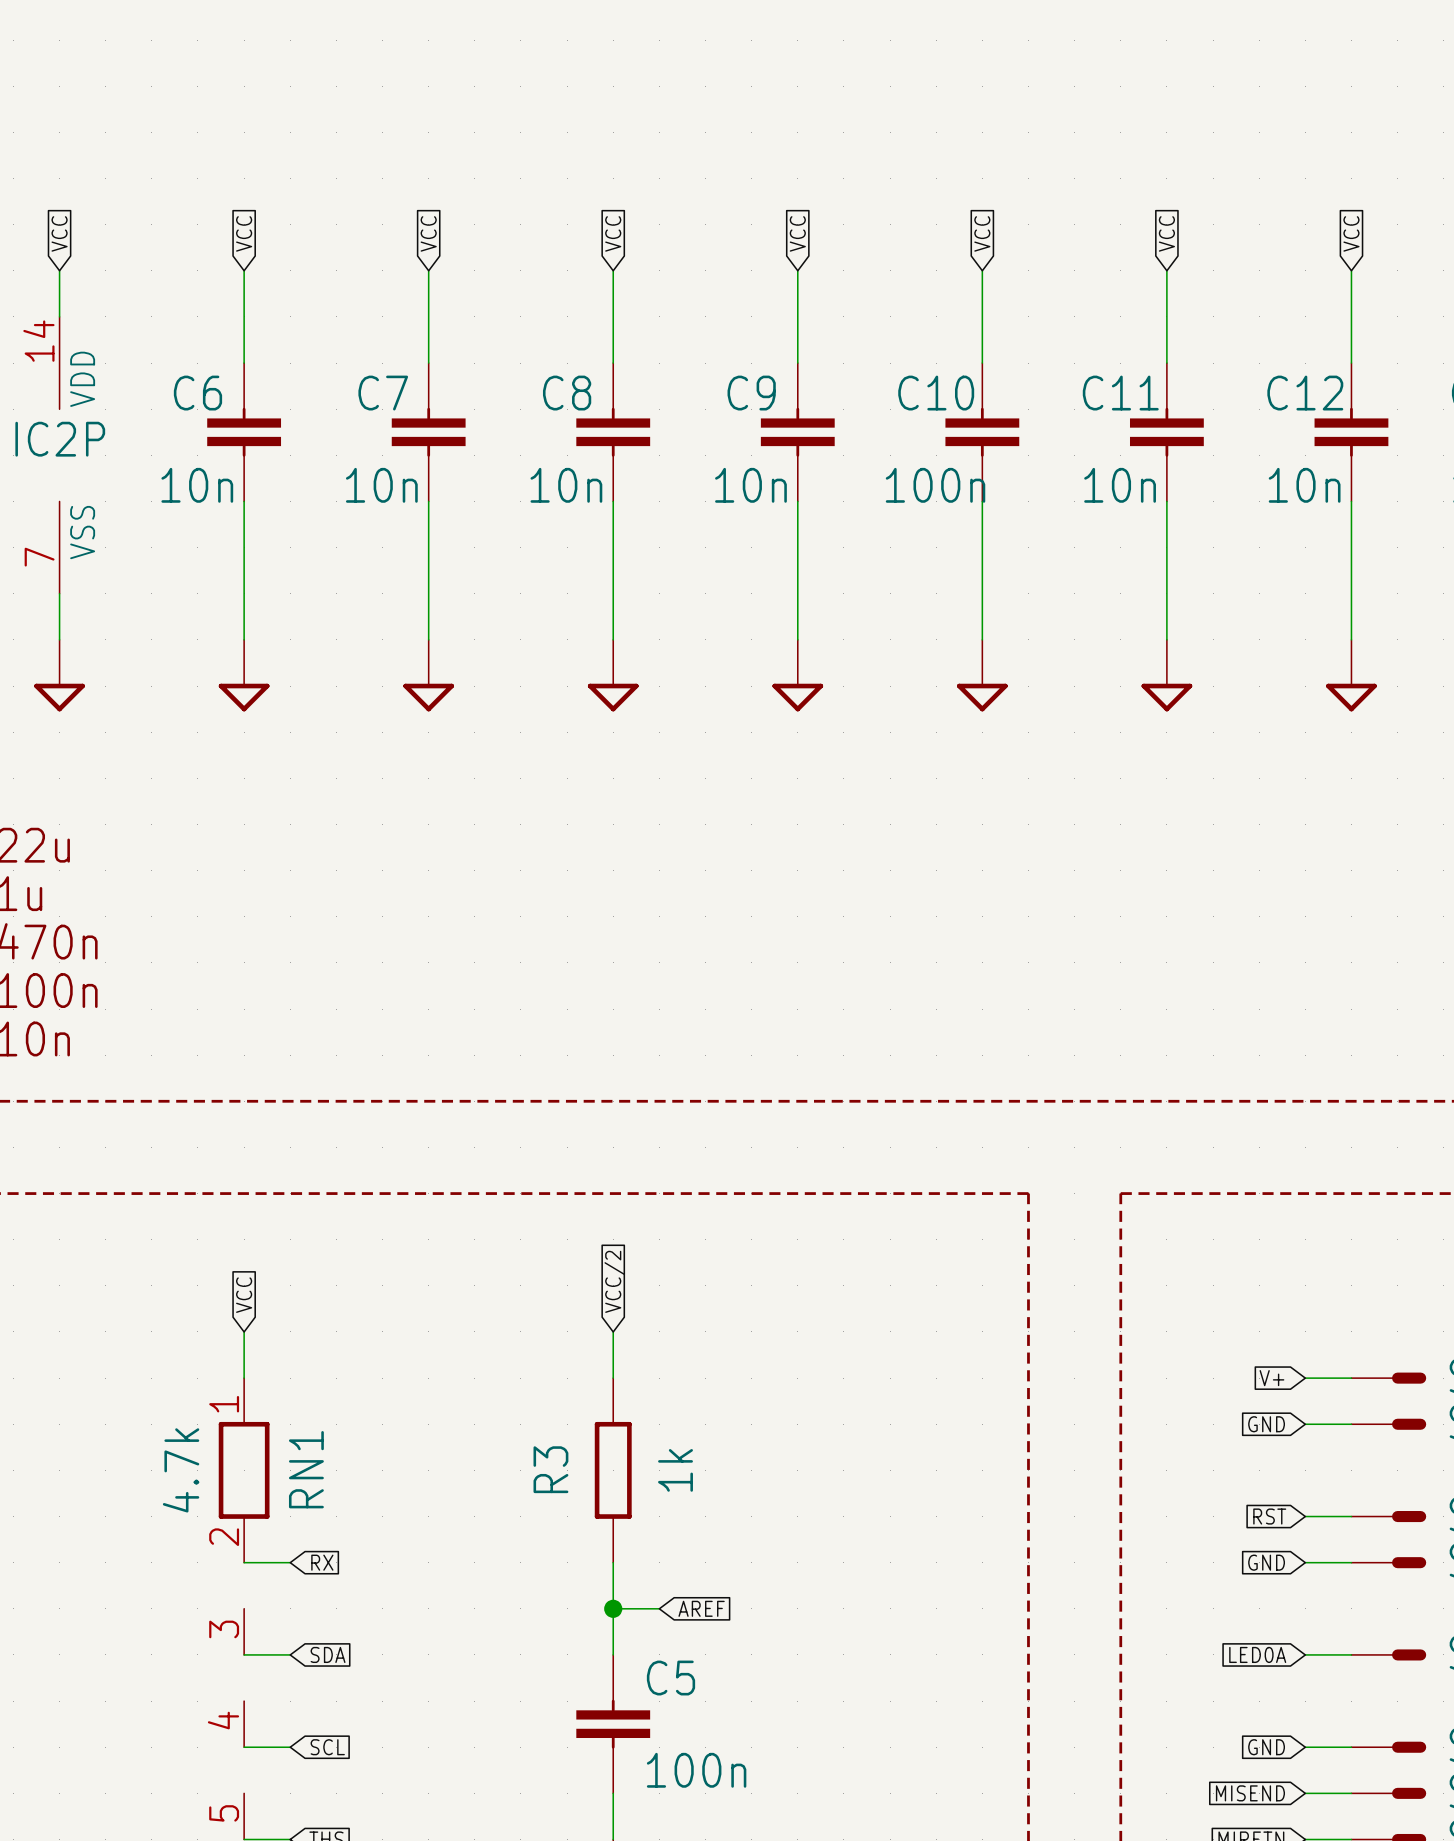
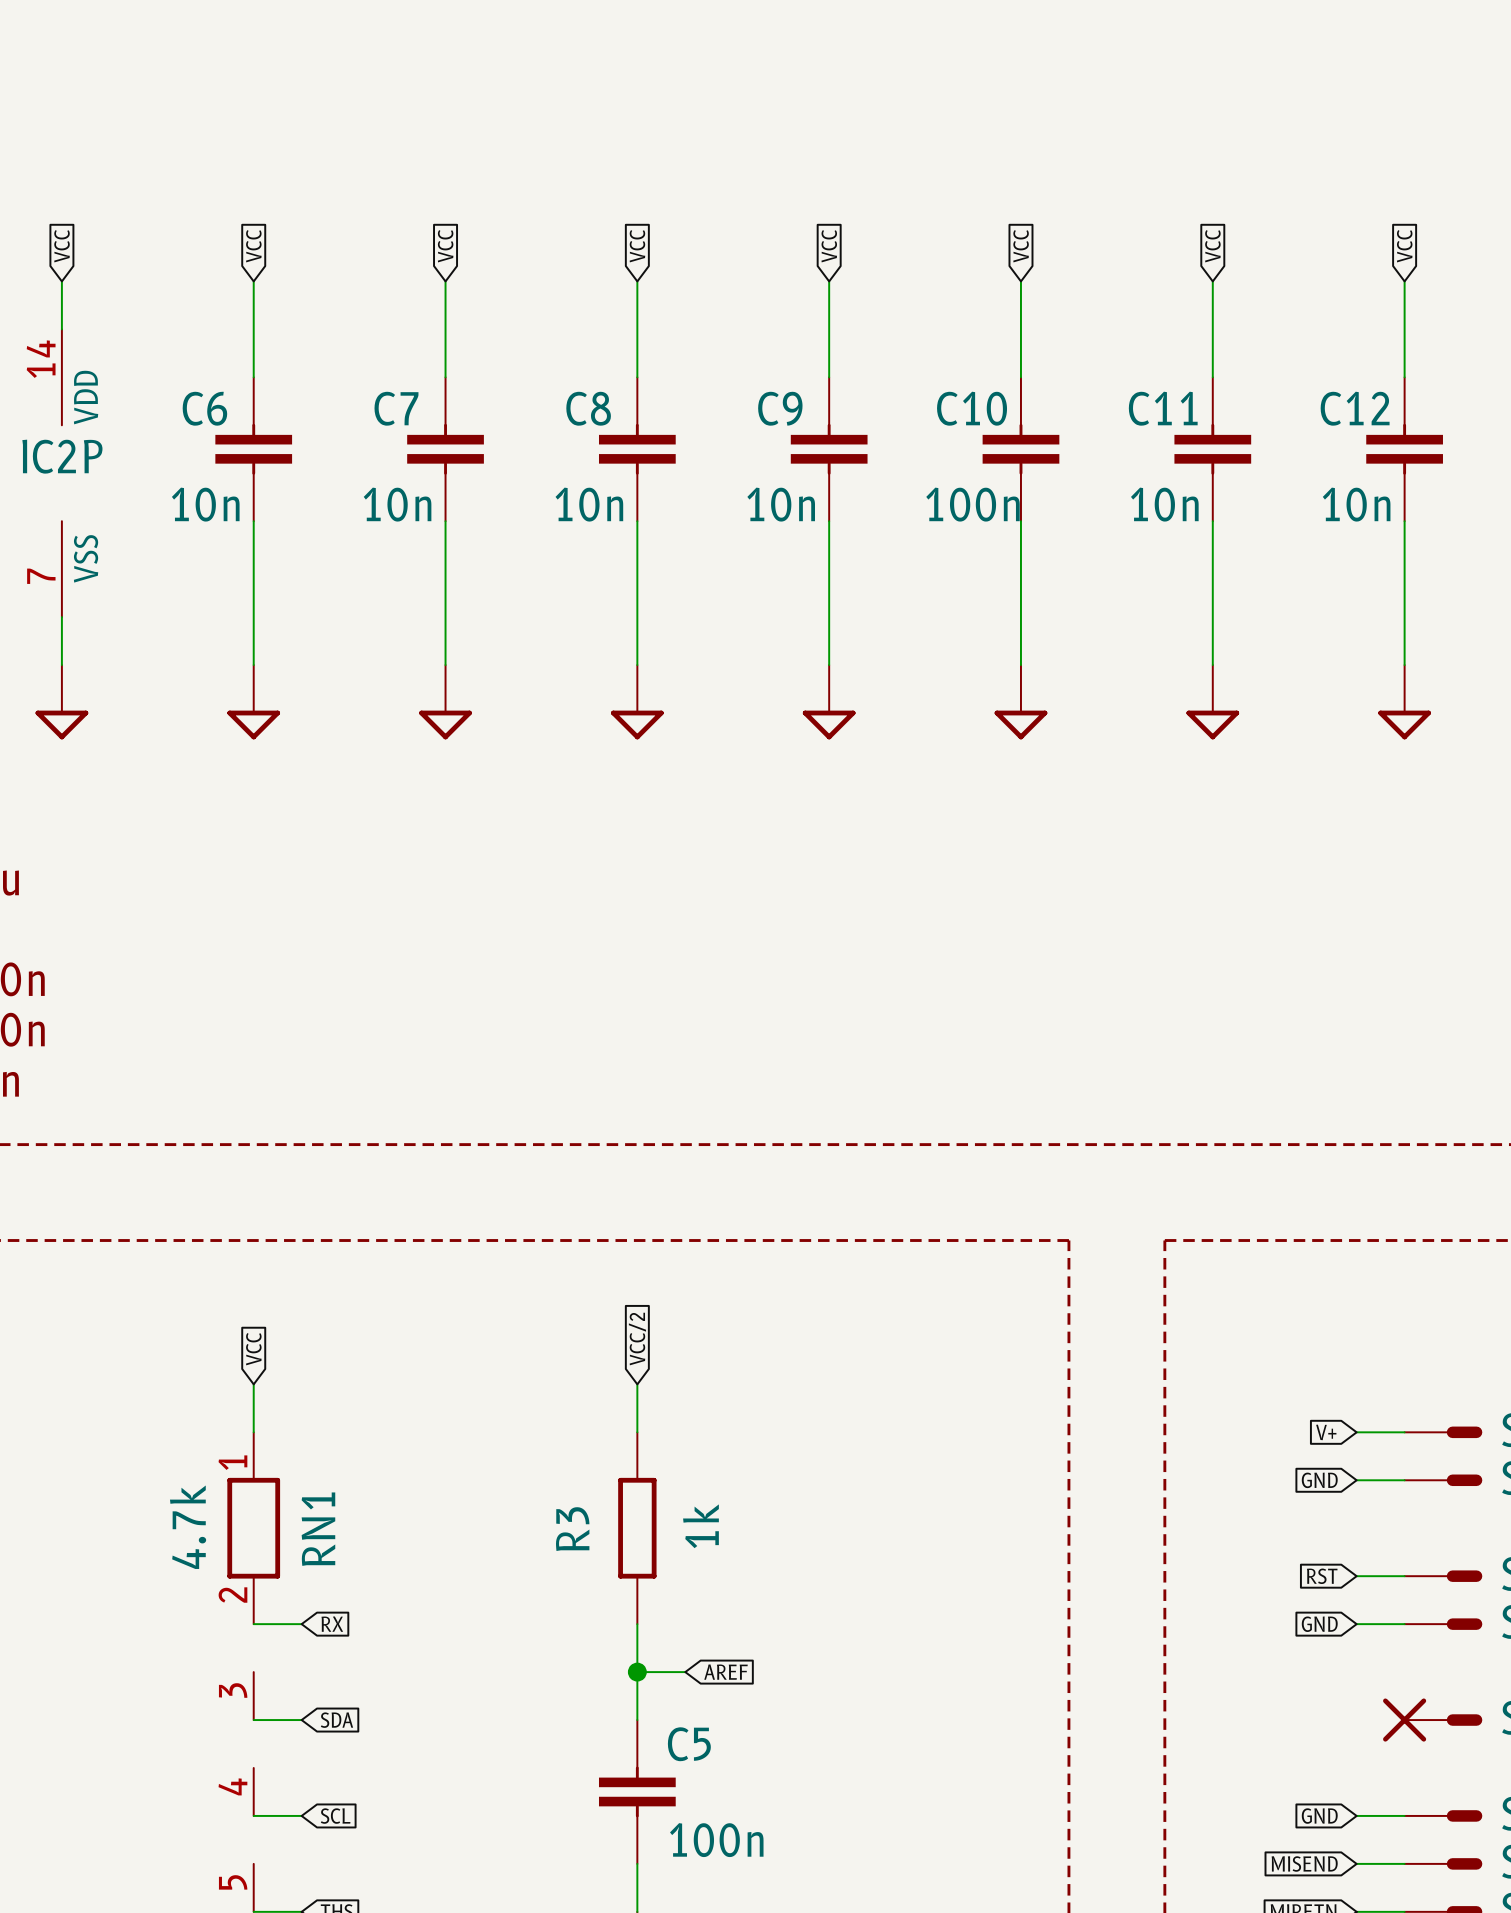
global label: LED0A (1257, 1654) -> none
wire: (1305, 1654) (1351, 1654) -> none
part: none -> (1404, 1720)

